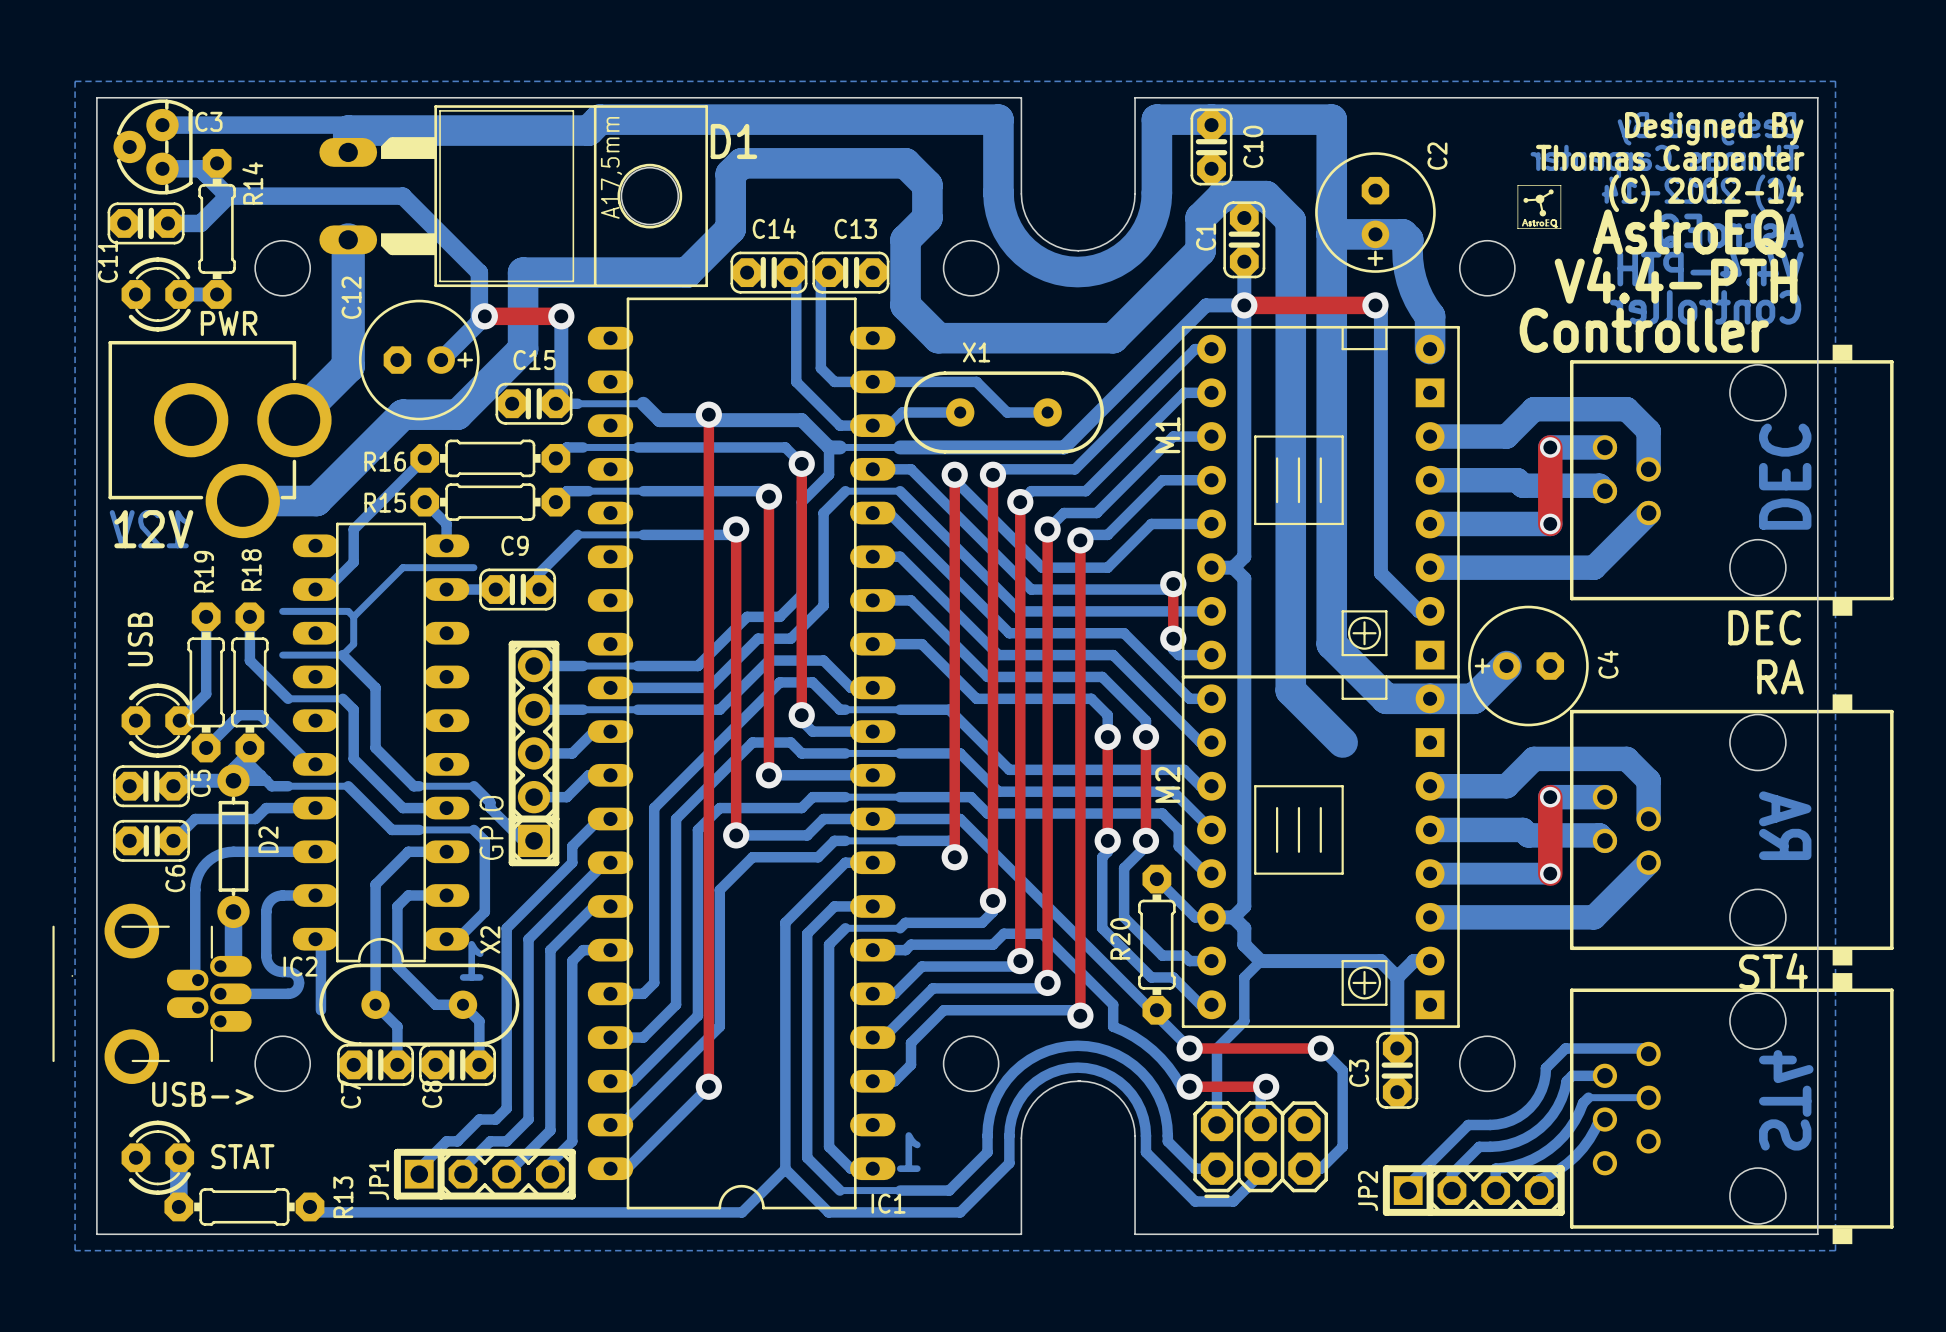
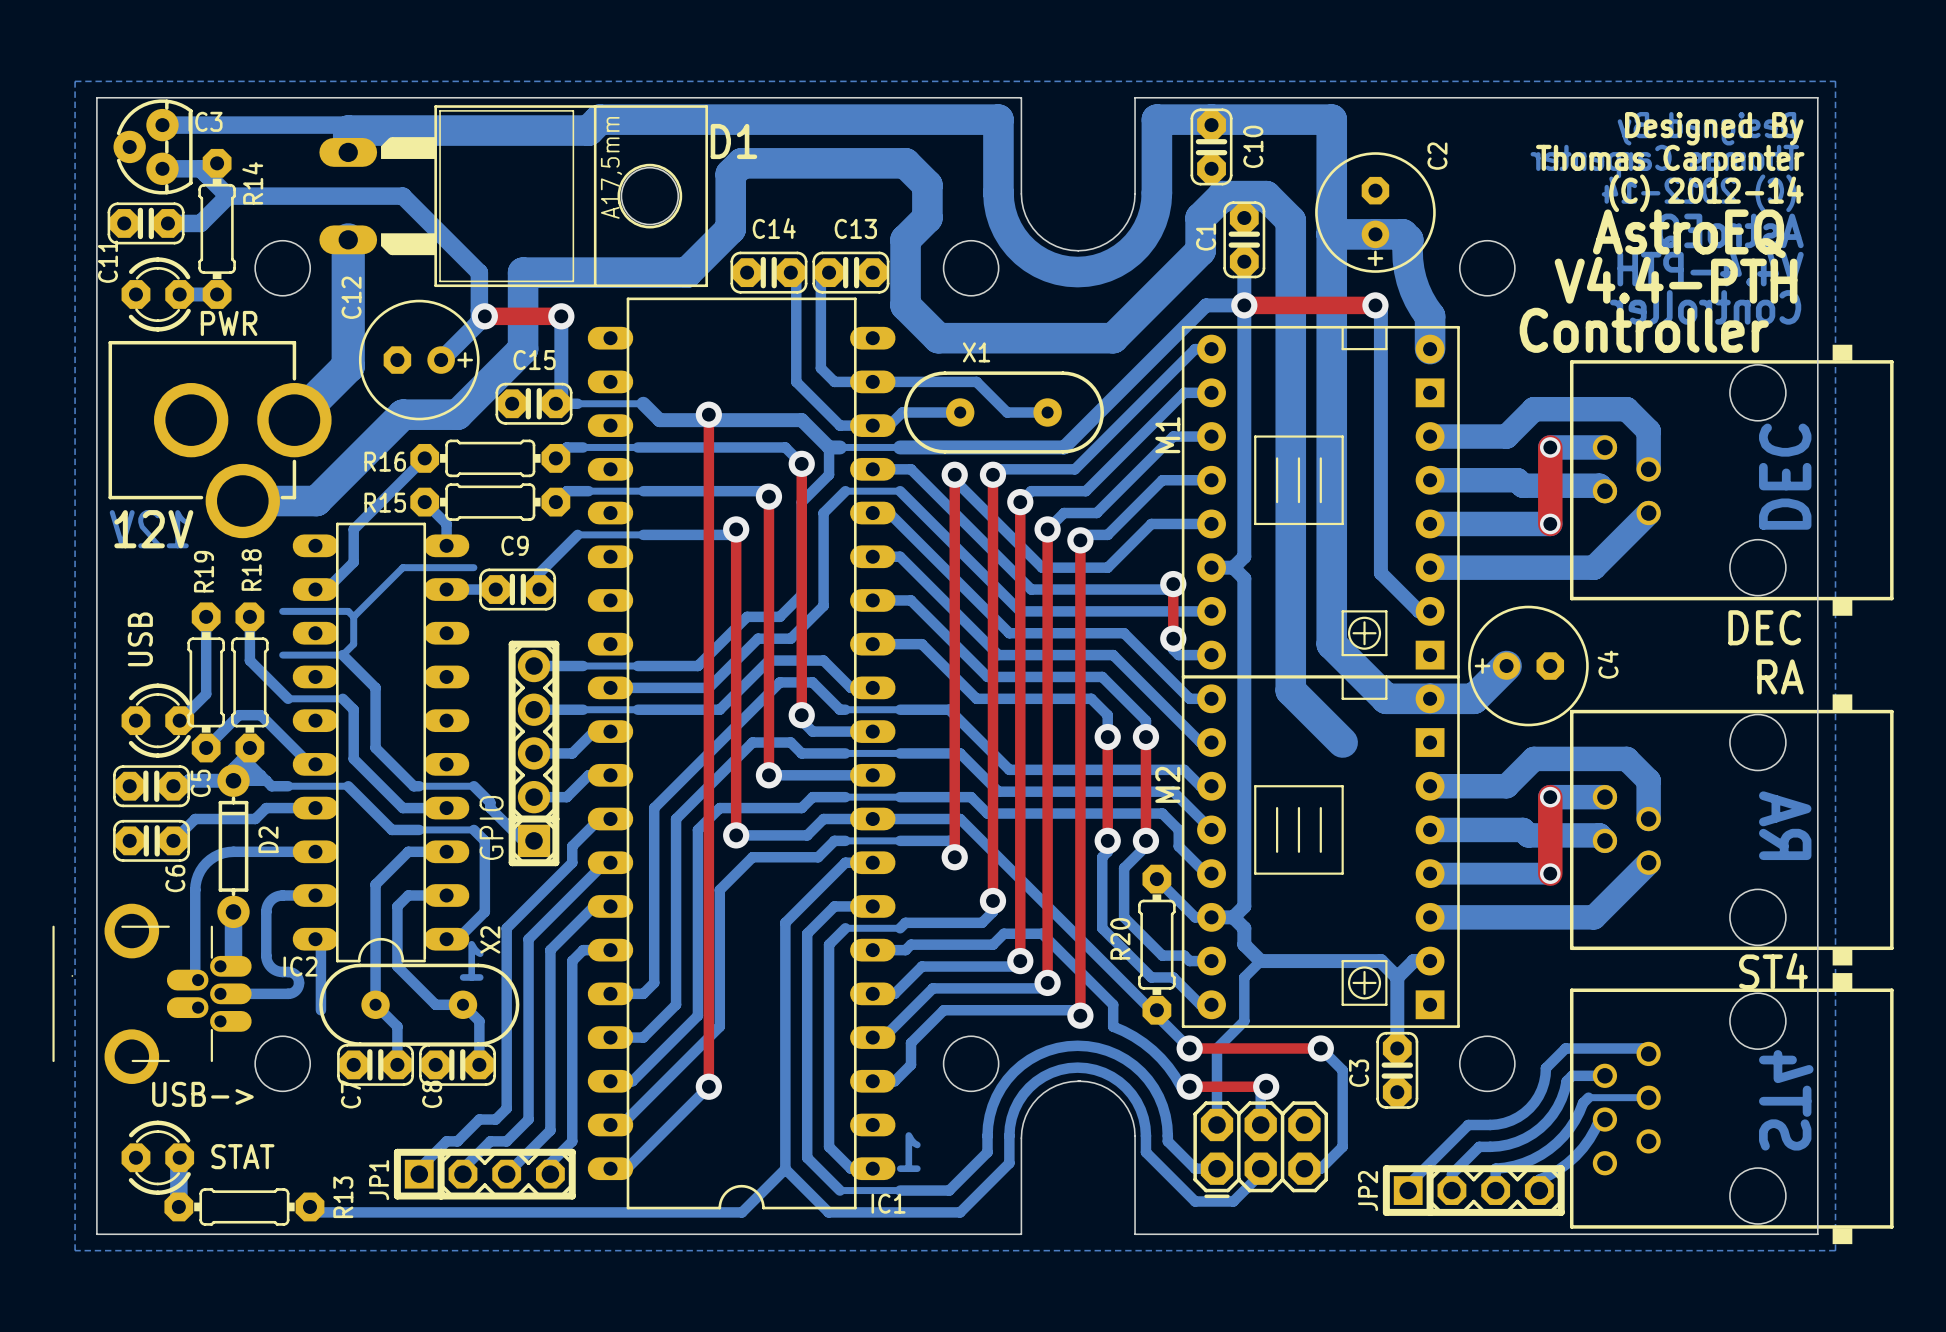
drawing: [1517, 185, 1562, 229] -> none

